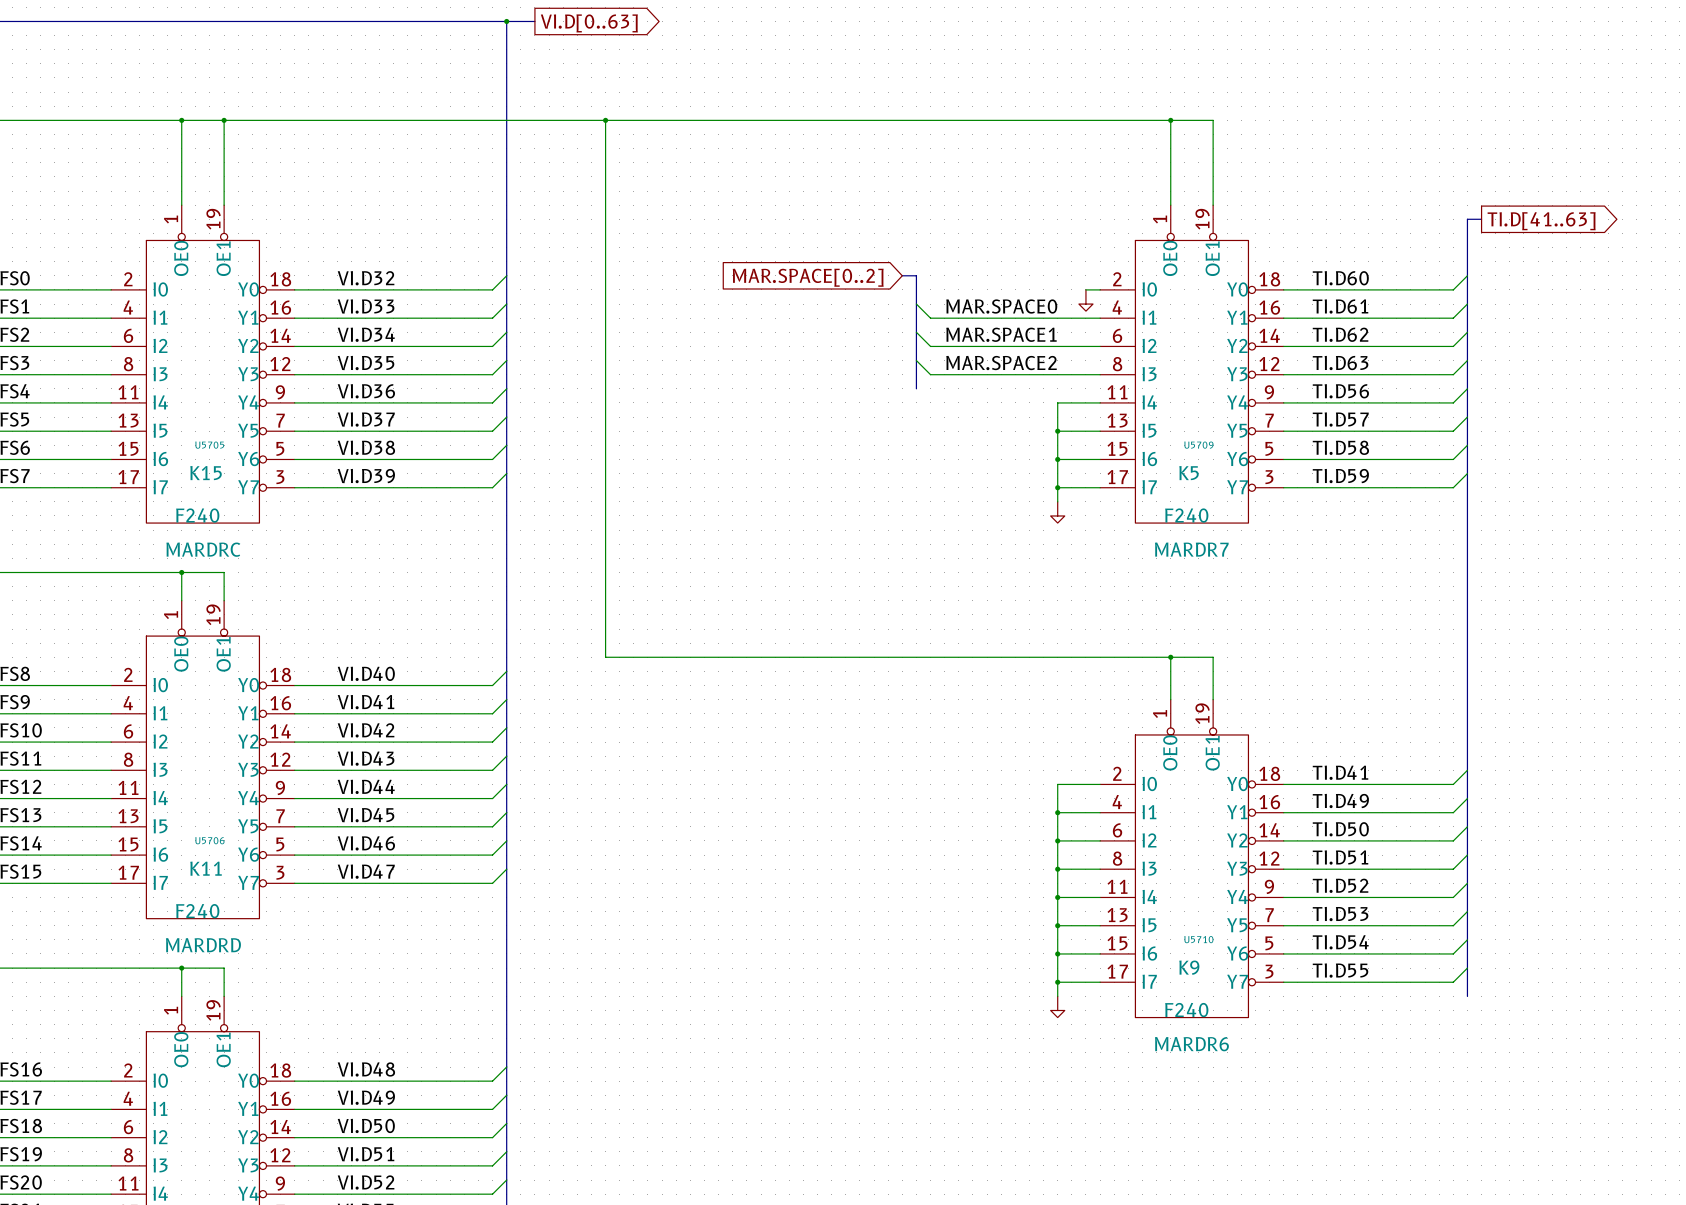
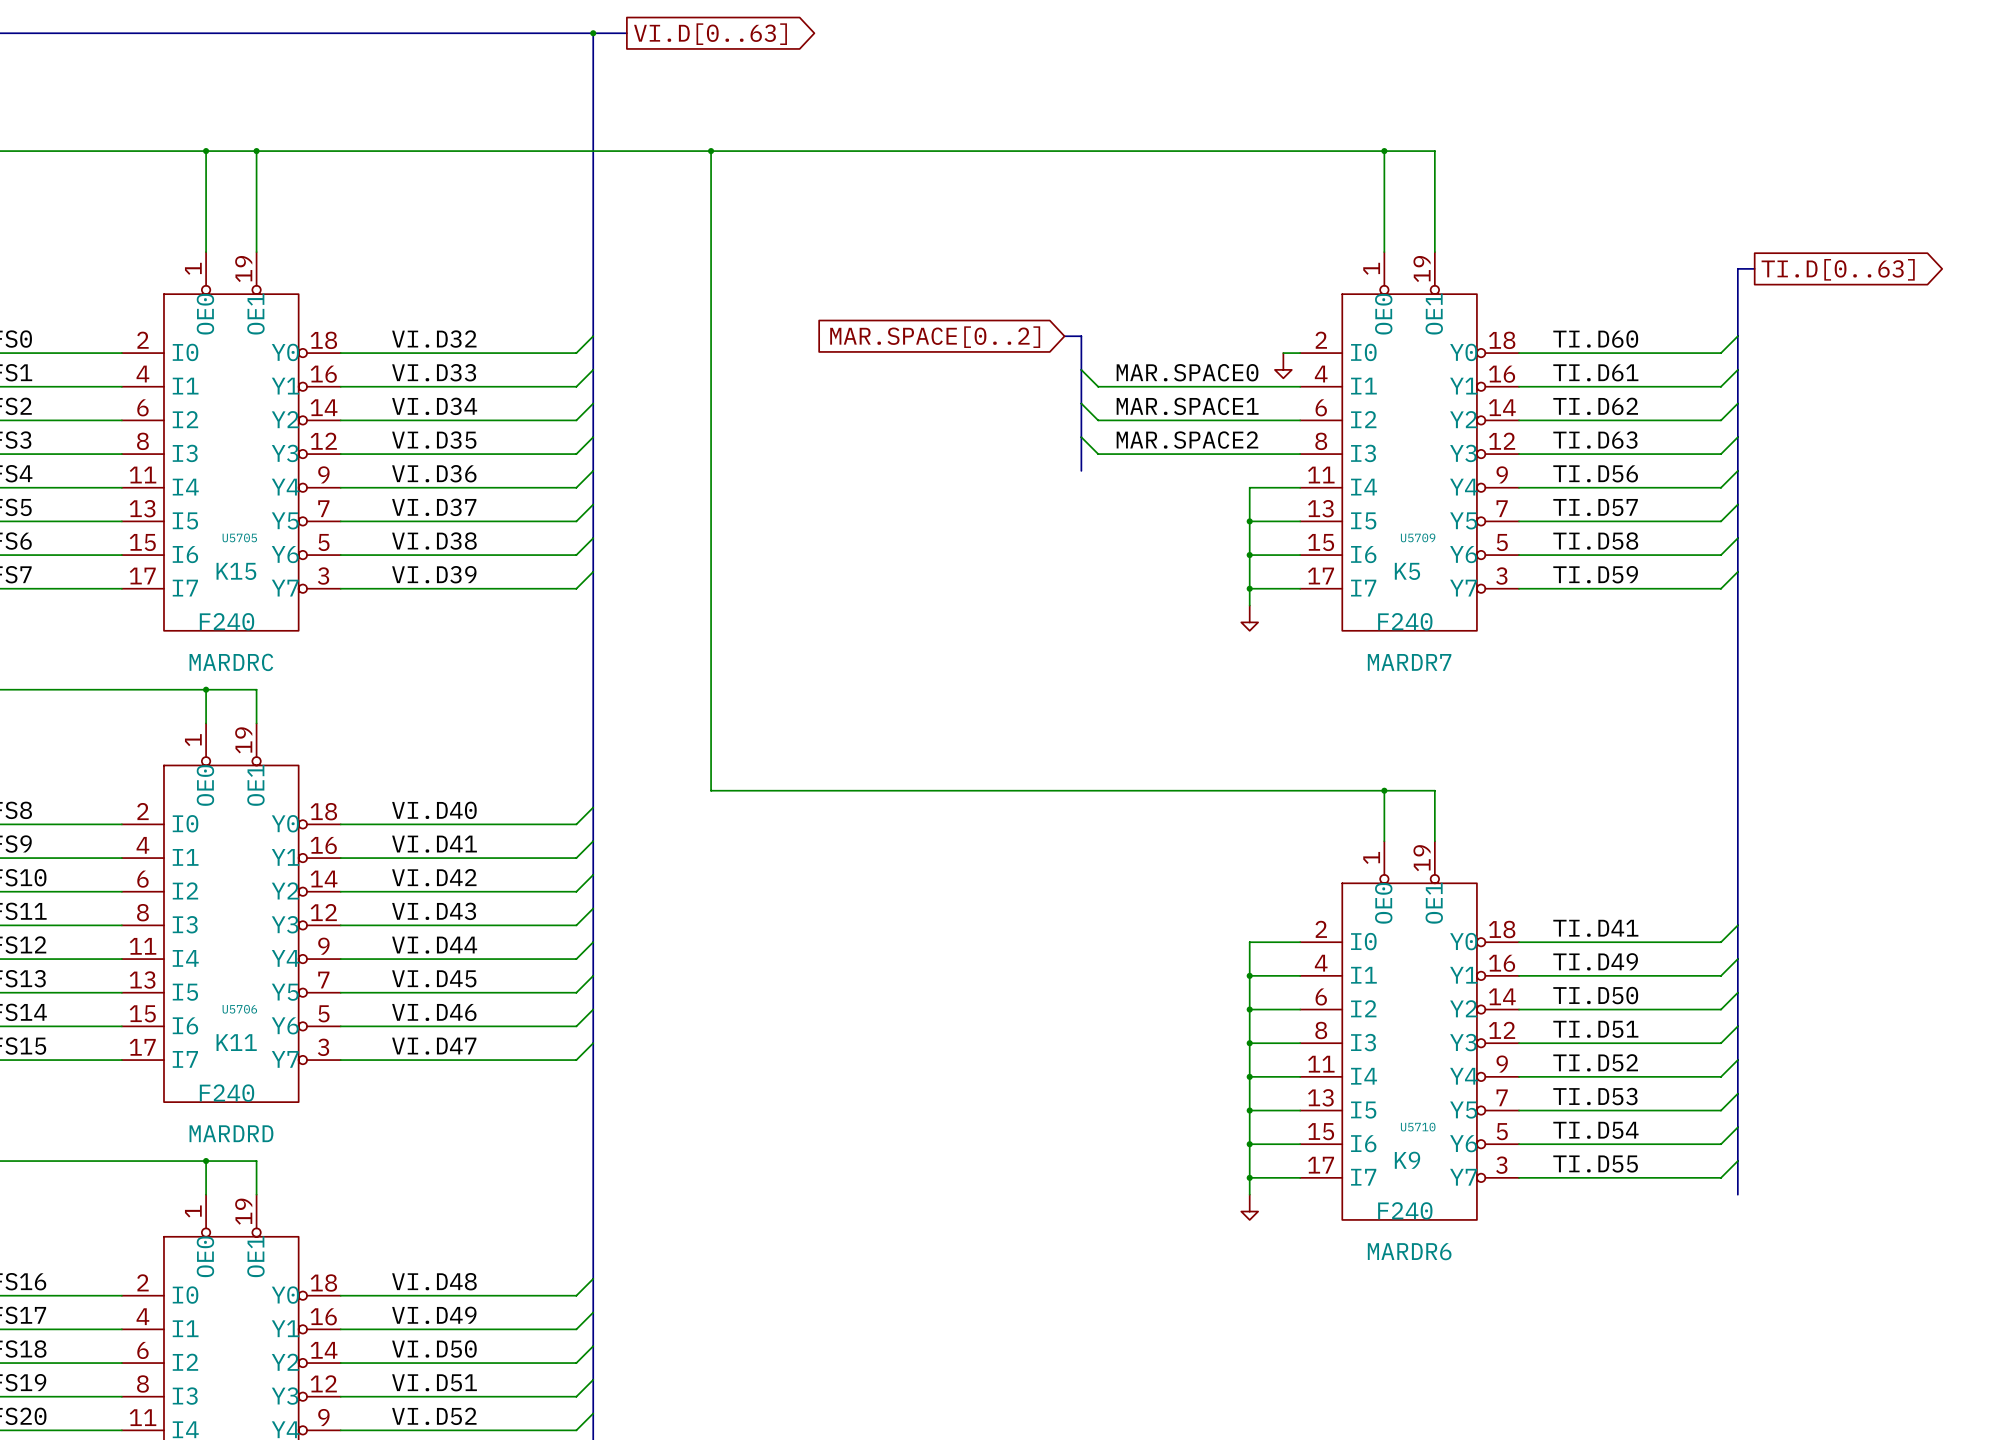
global label: TI.D[41..63] (1541, 221) -> TI.D[0..63] (1838, 269)

